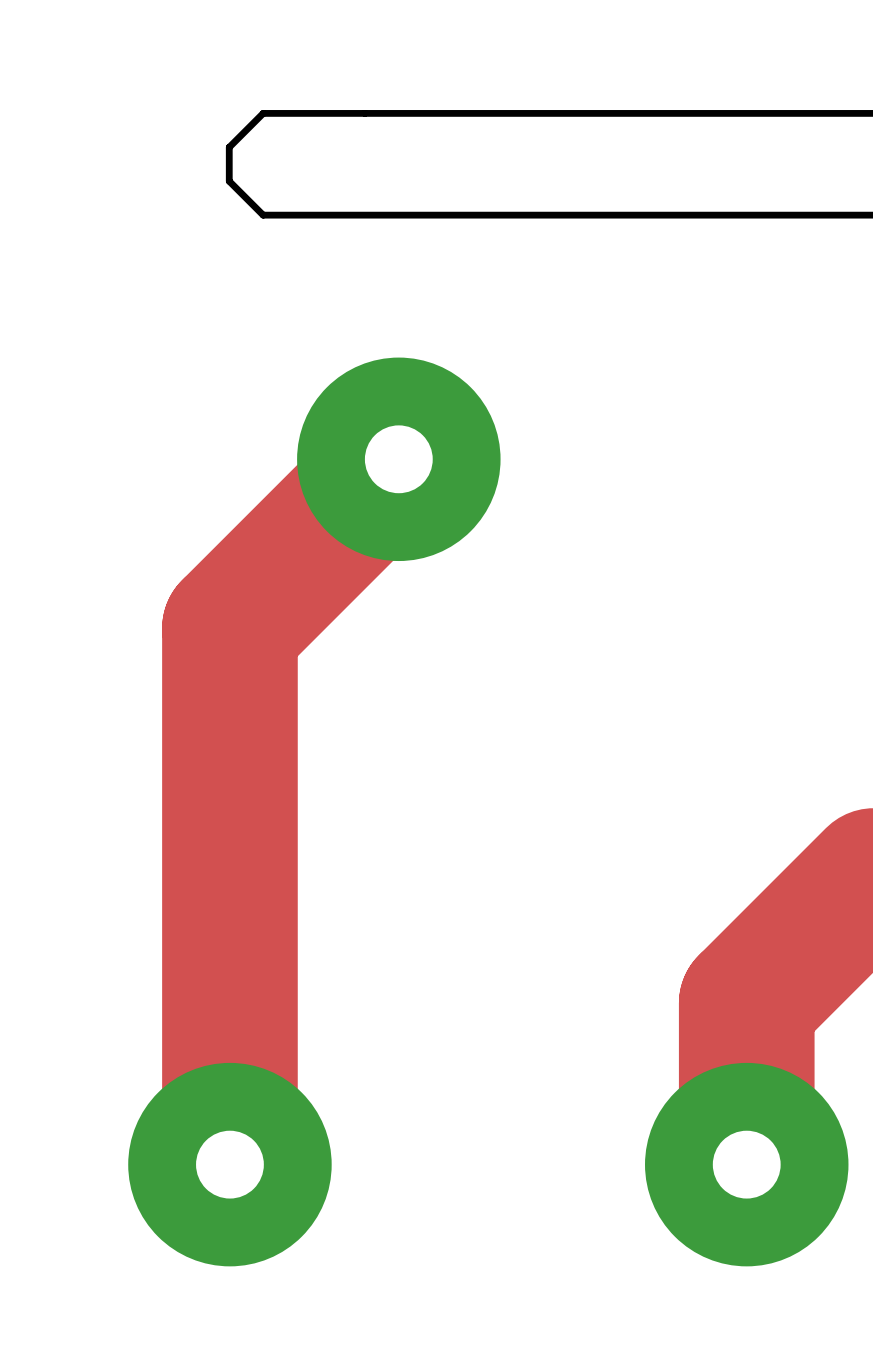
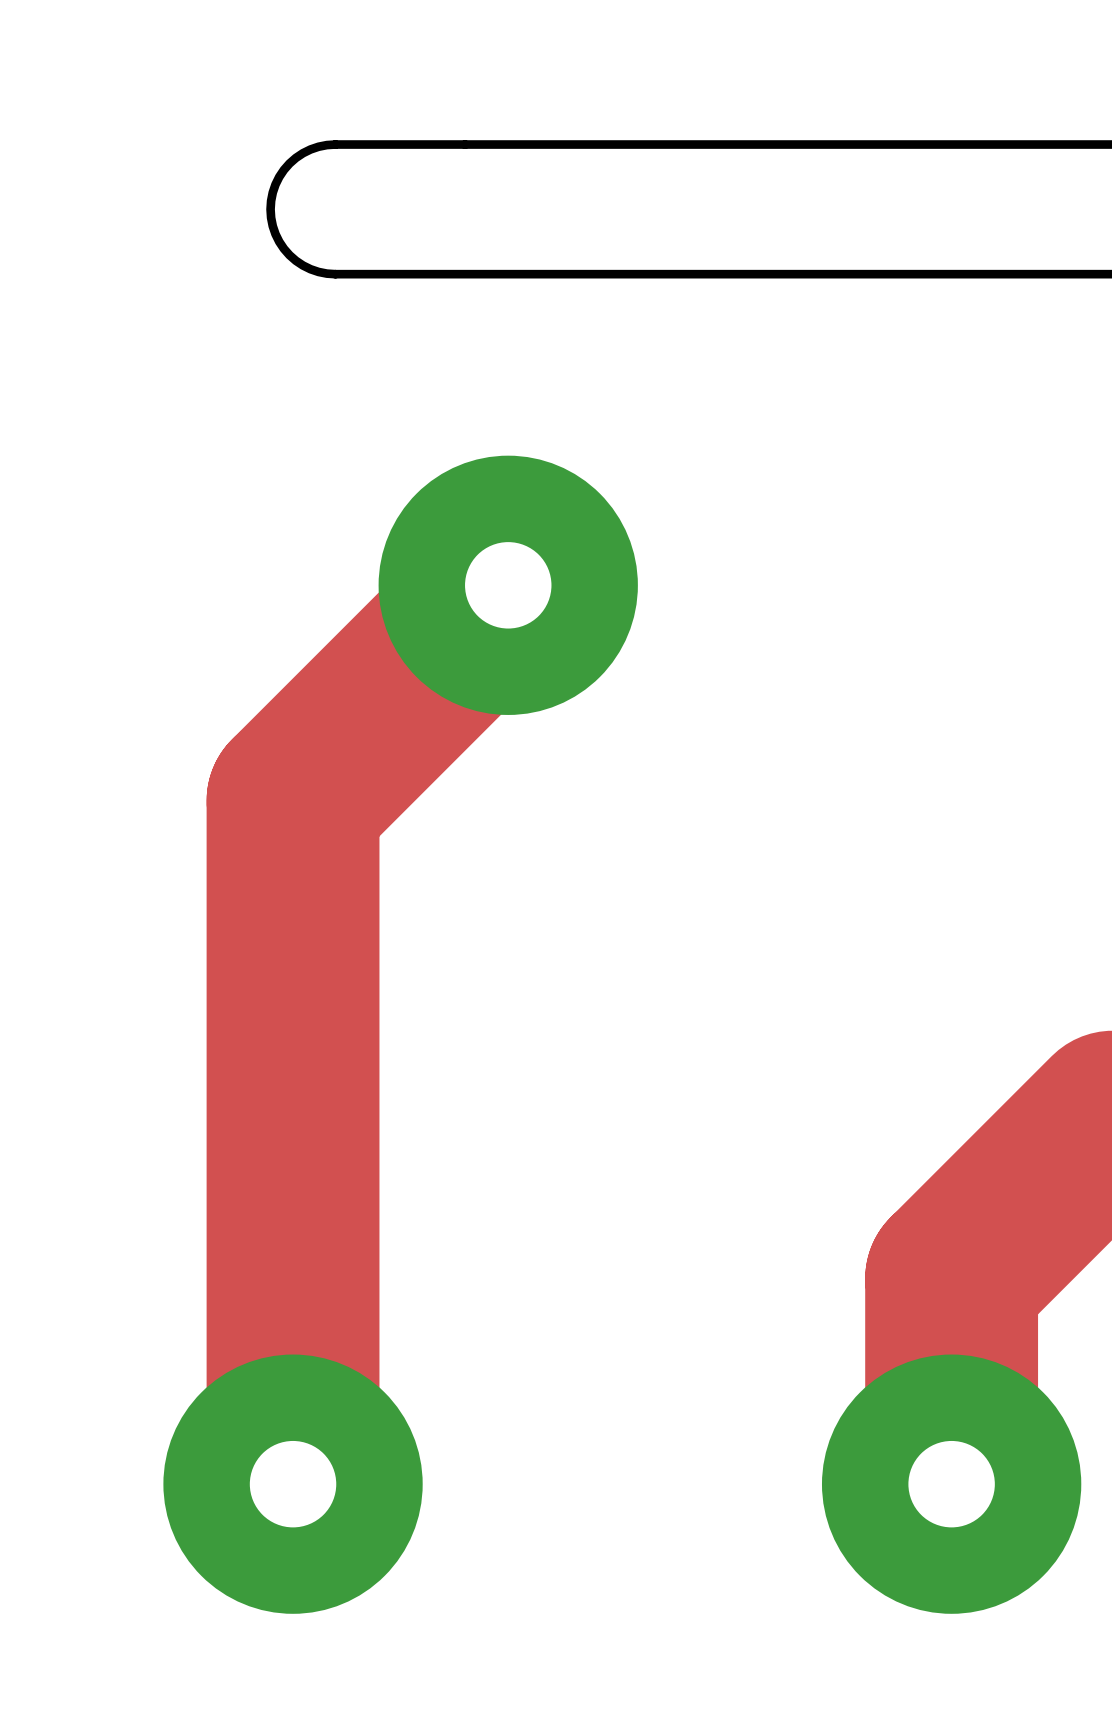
board edge: (263, 113) (229, 147) (229, 181) (263, 215) -> (335, 144) (310, 149) (289, 163) (275, 184) (270, 209) (275, 234) (289, 255) (310, 269) (335, 274)

